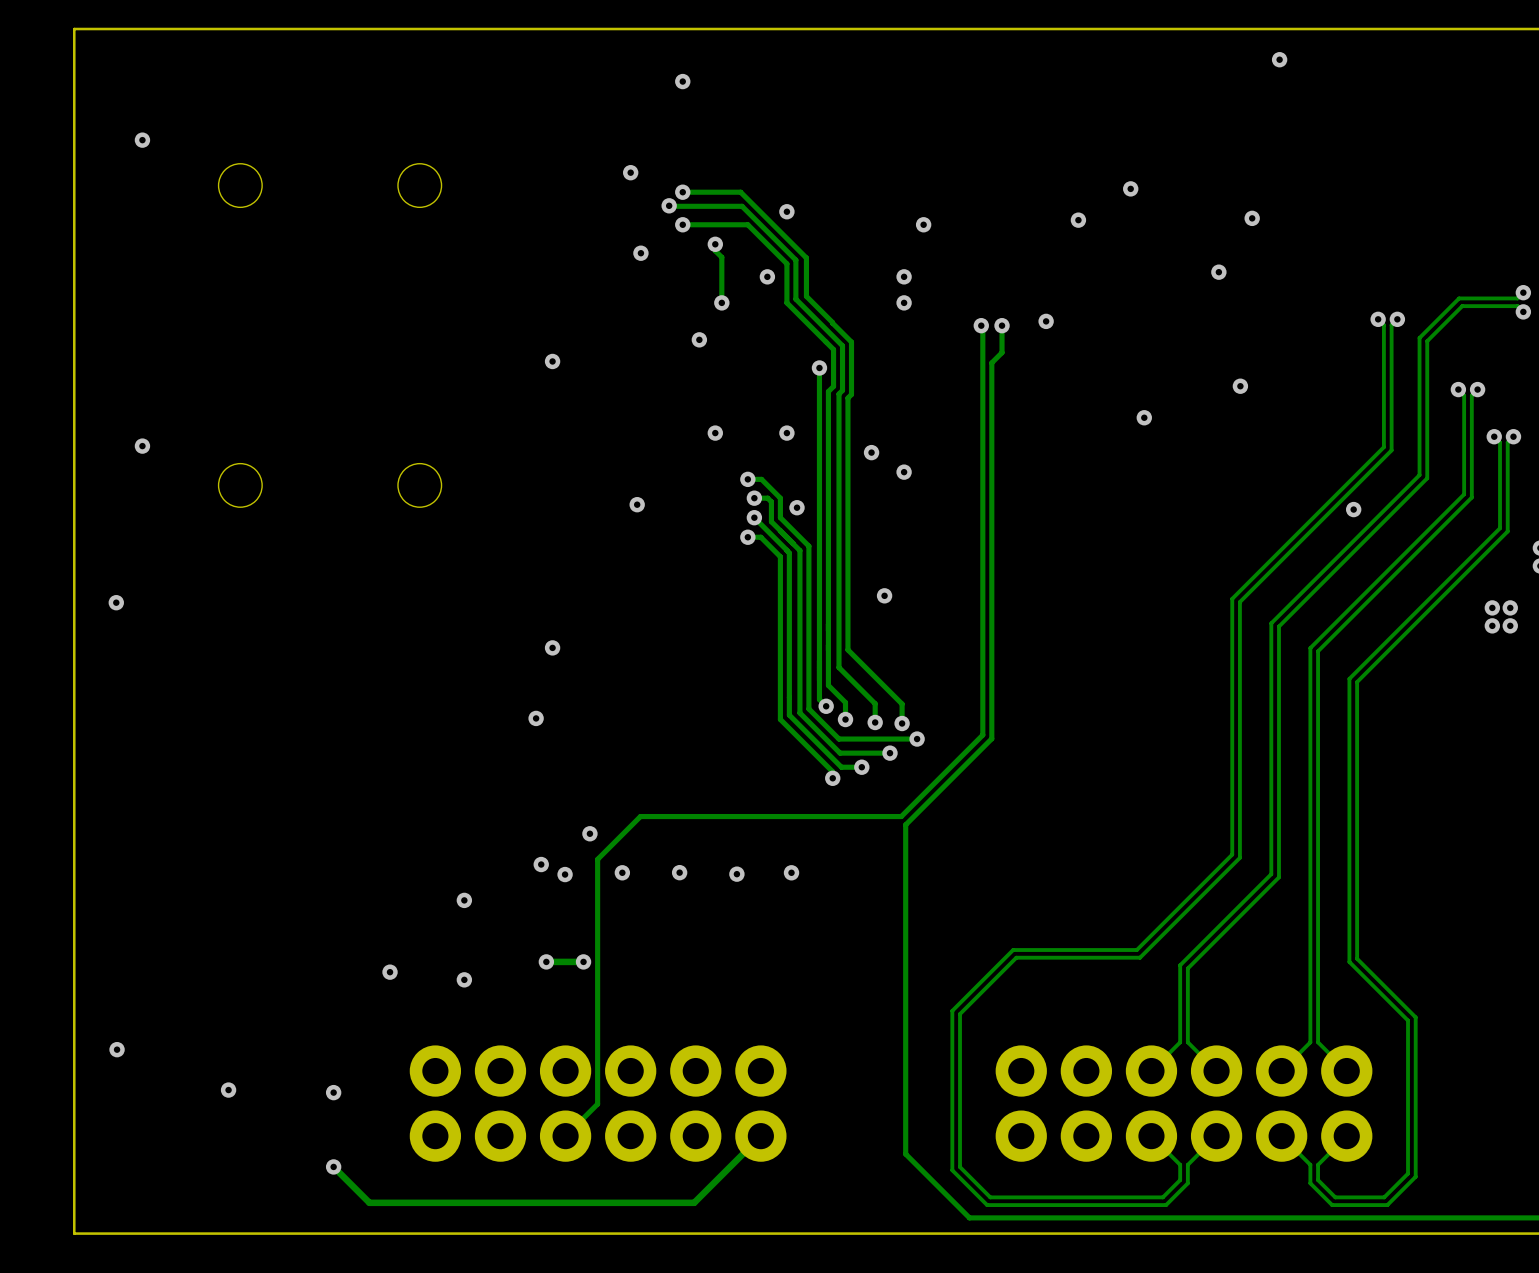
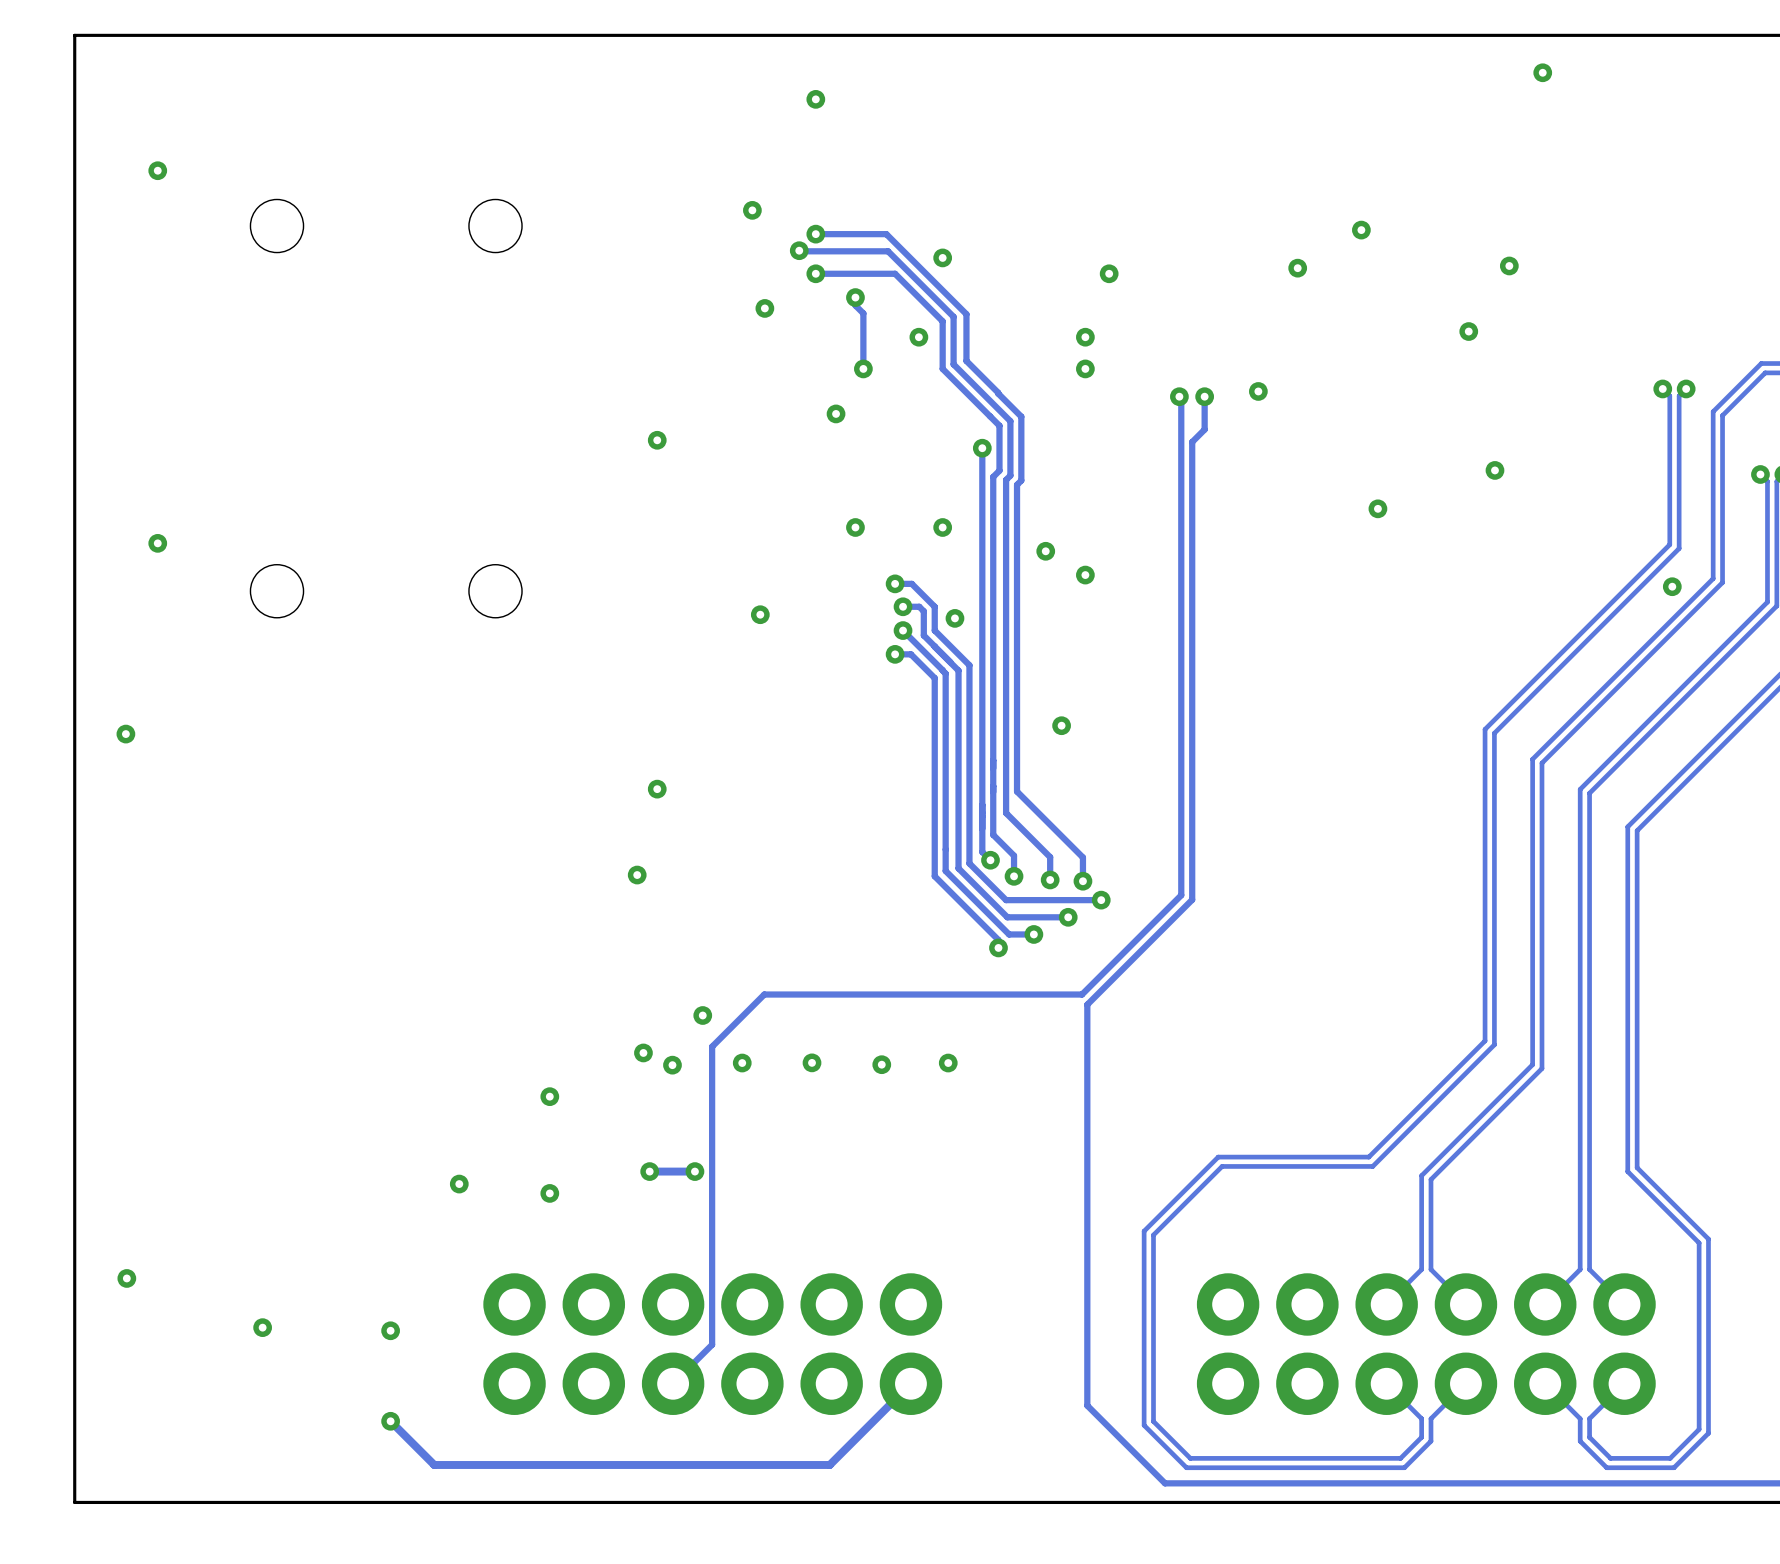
via position: (1353, 509) -> (1672, 586)

